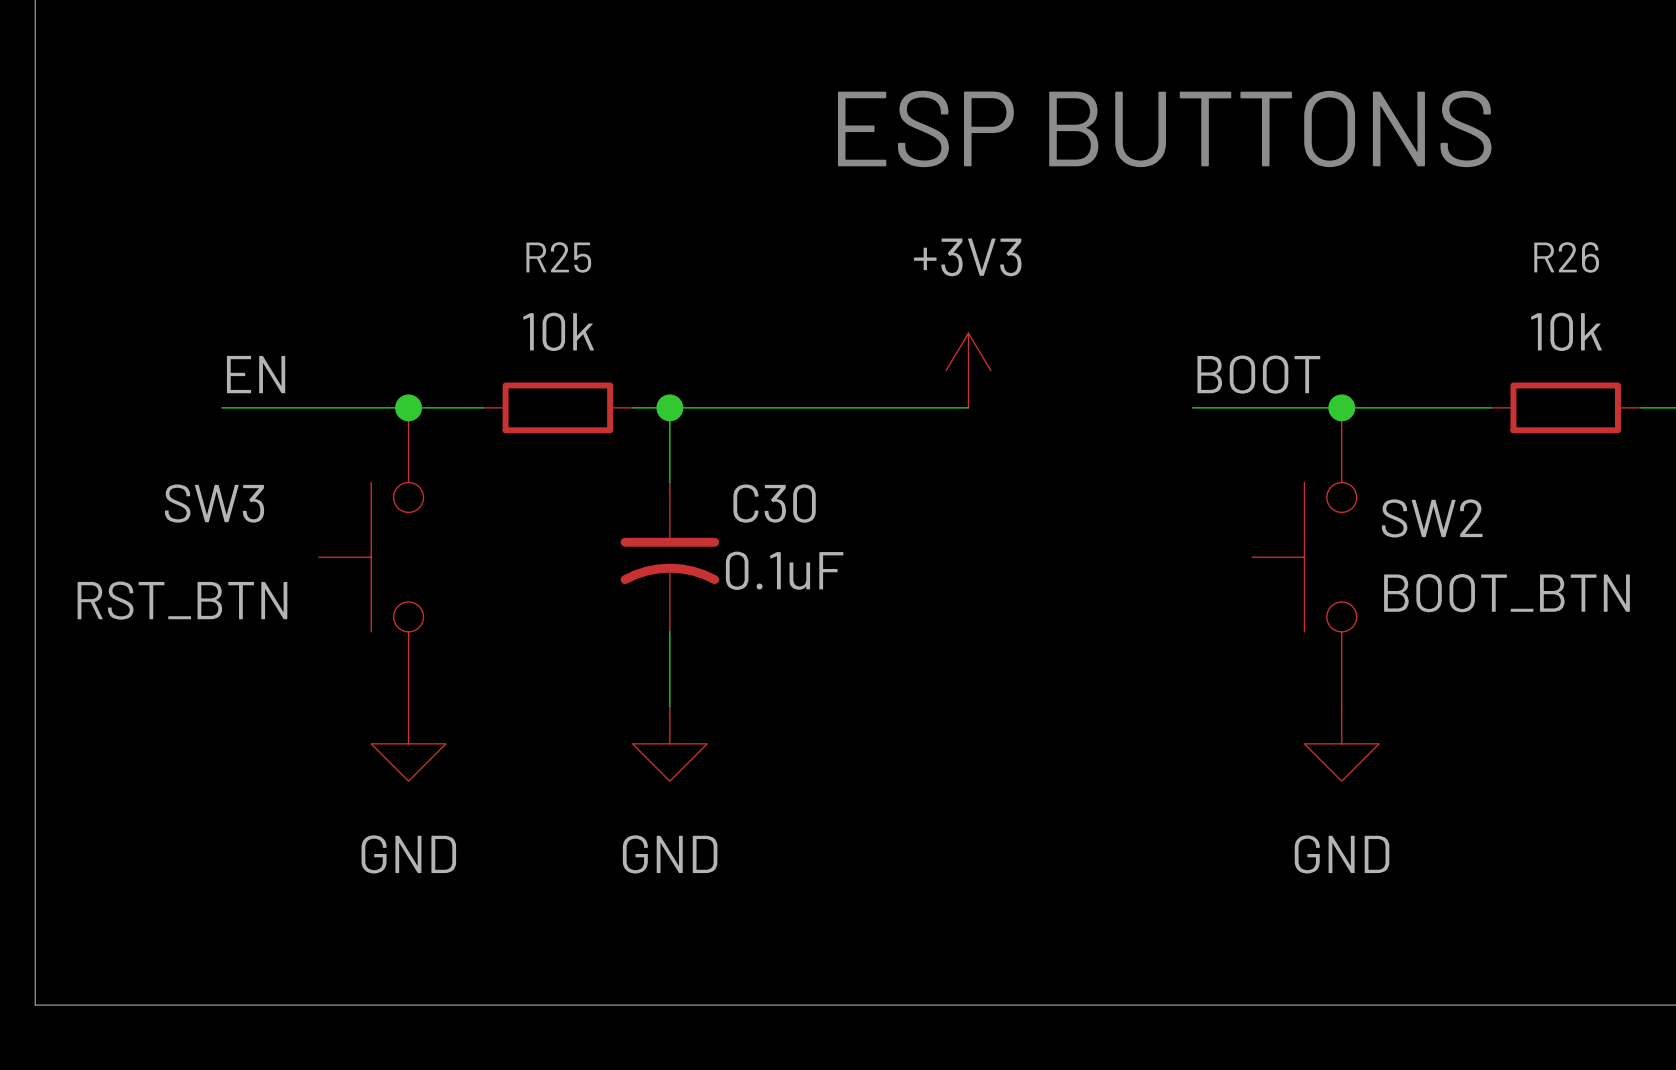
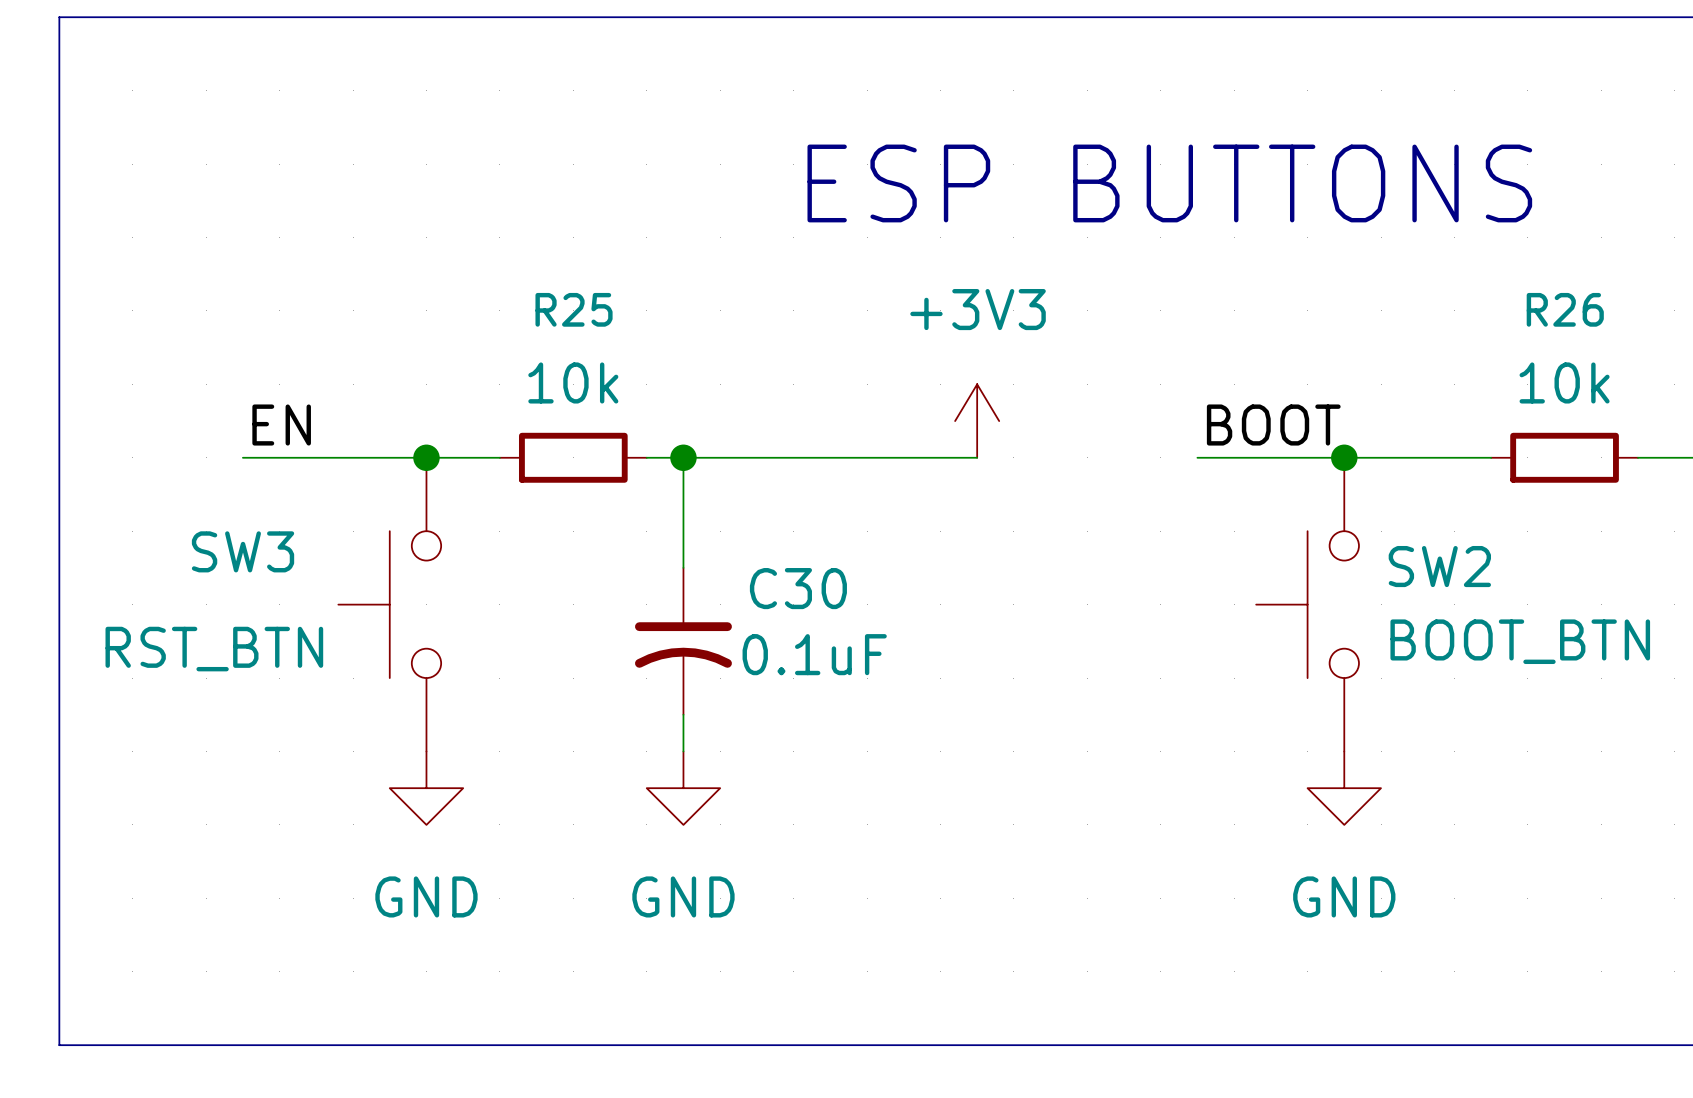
C30 position: (669, 557) -> (683, 641)

